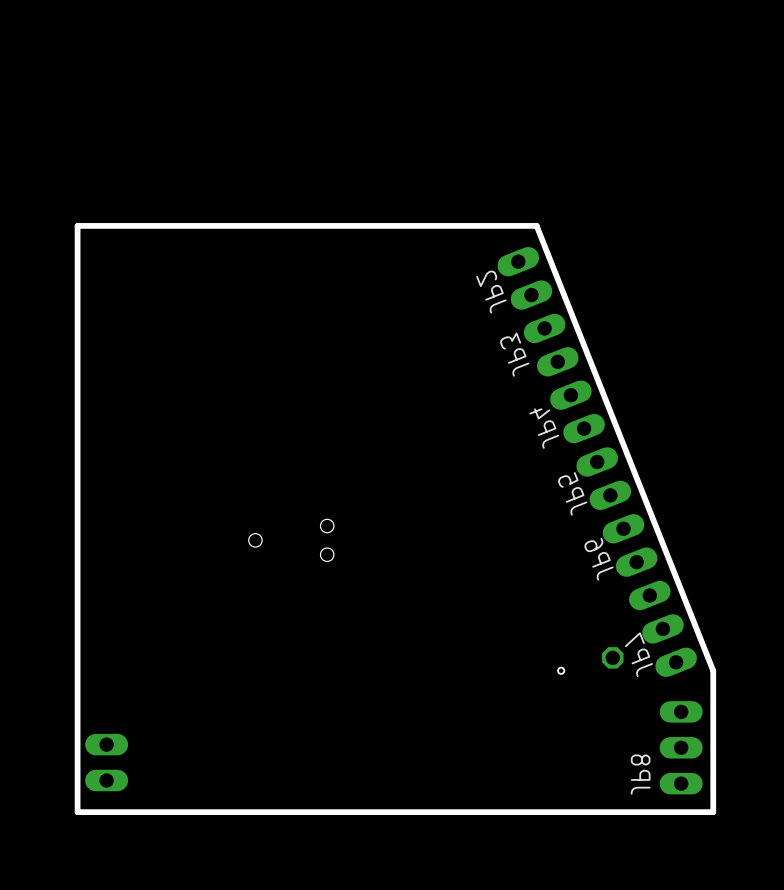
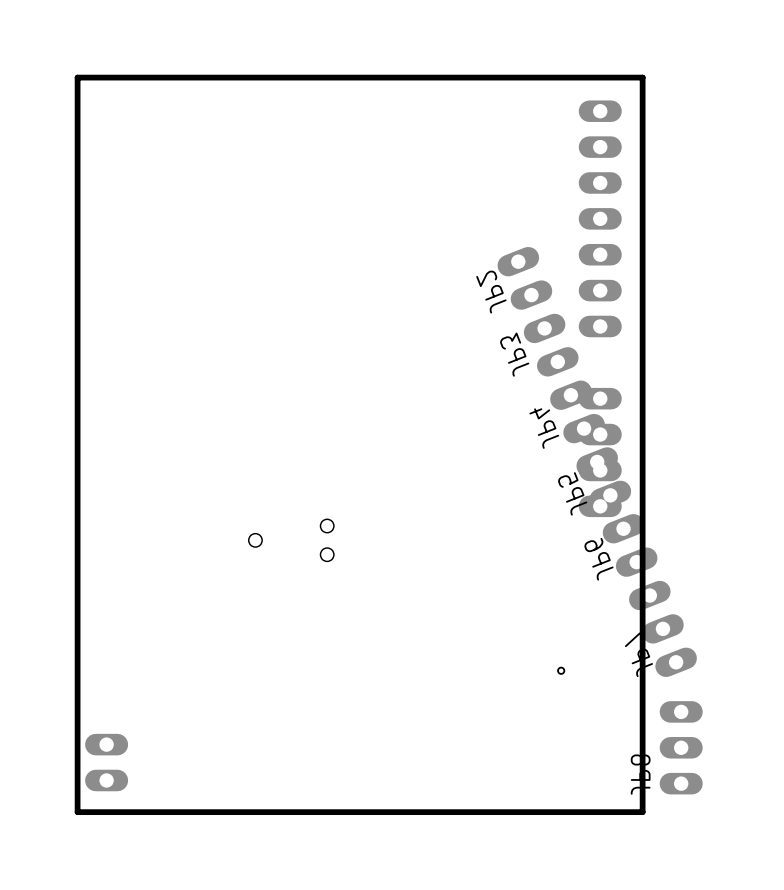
part: none -> (600, 218)
board edge: (77, 225) (536, 225) (713, 670) (713, 812) (642, 812) -> (77, 225) (77, 77) (642, 77) (642, 812)
part: none -> (600, 452)
part: (612, 657) -> none

